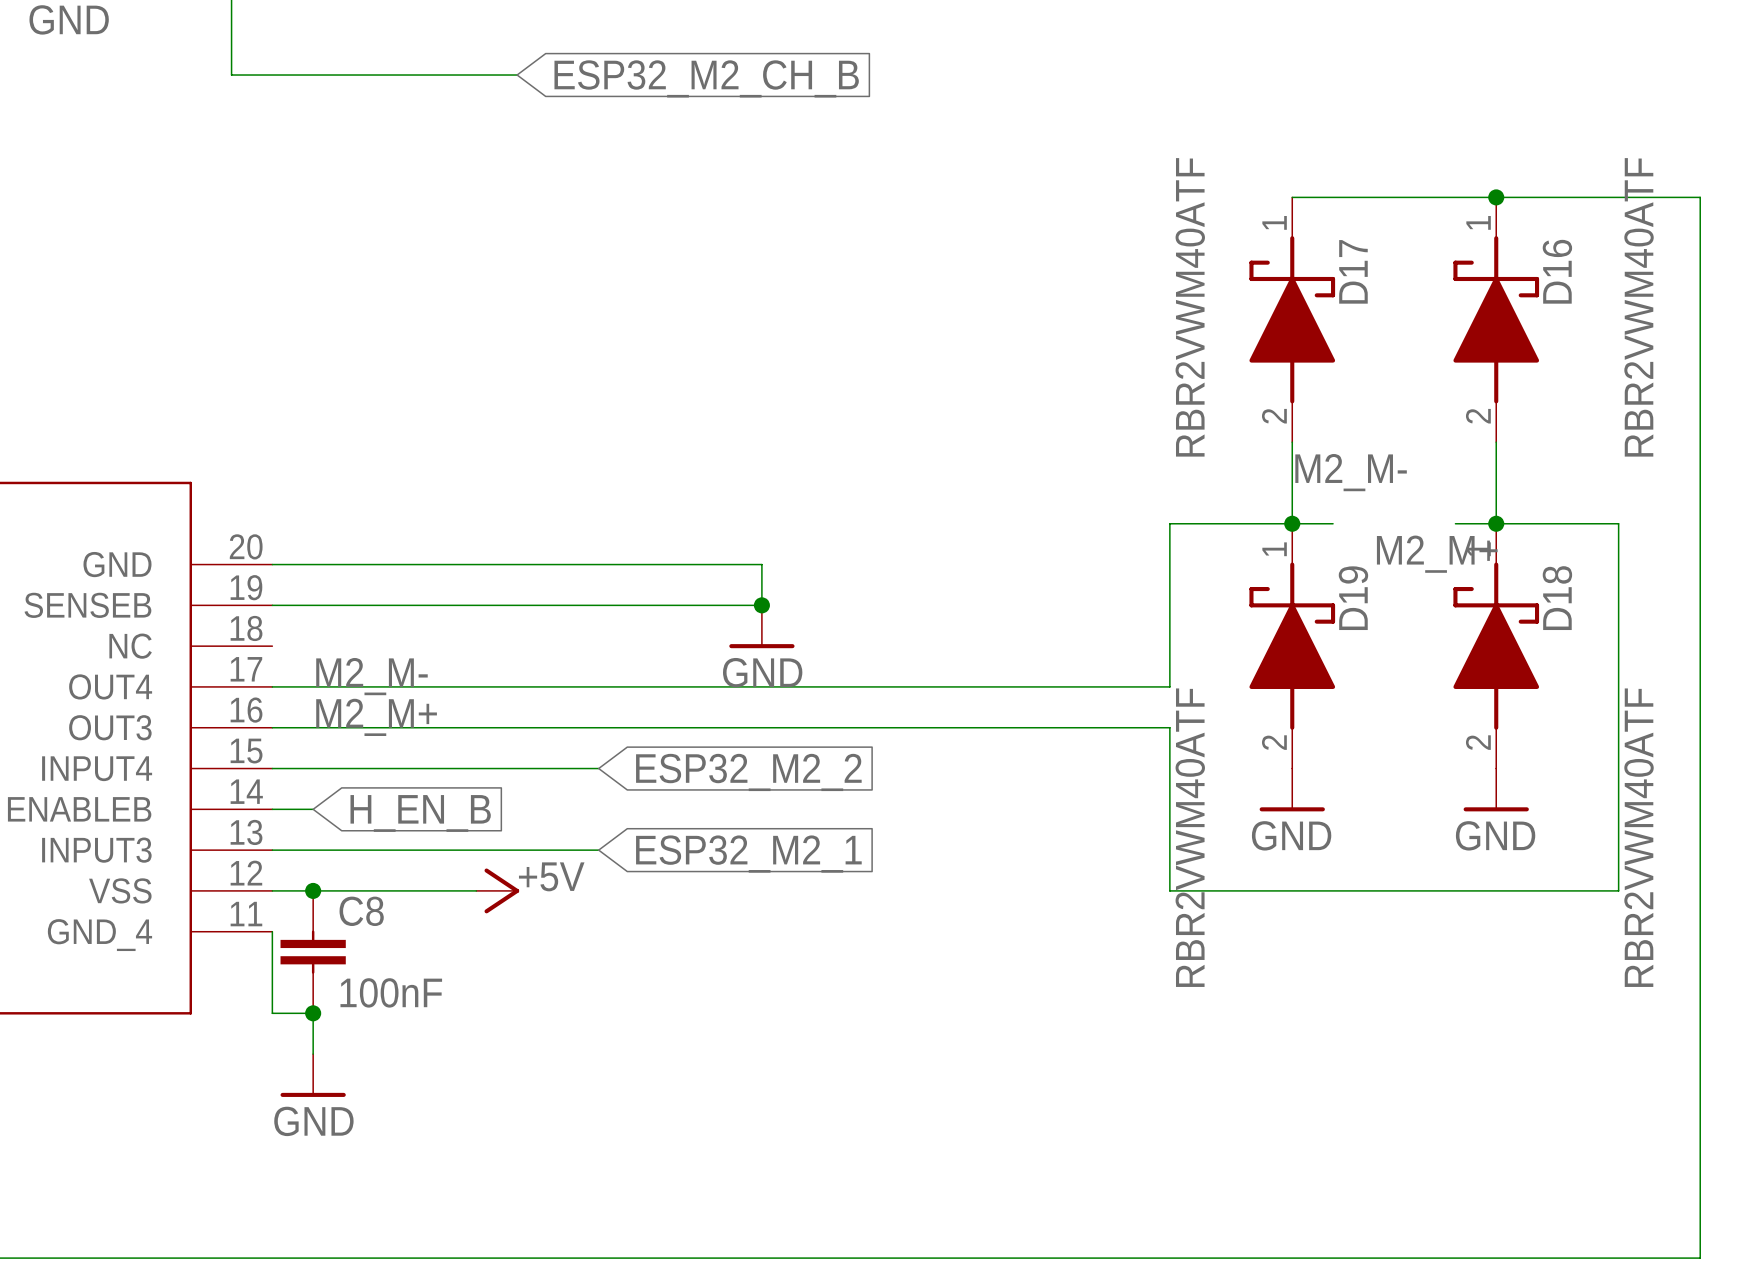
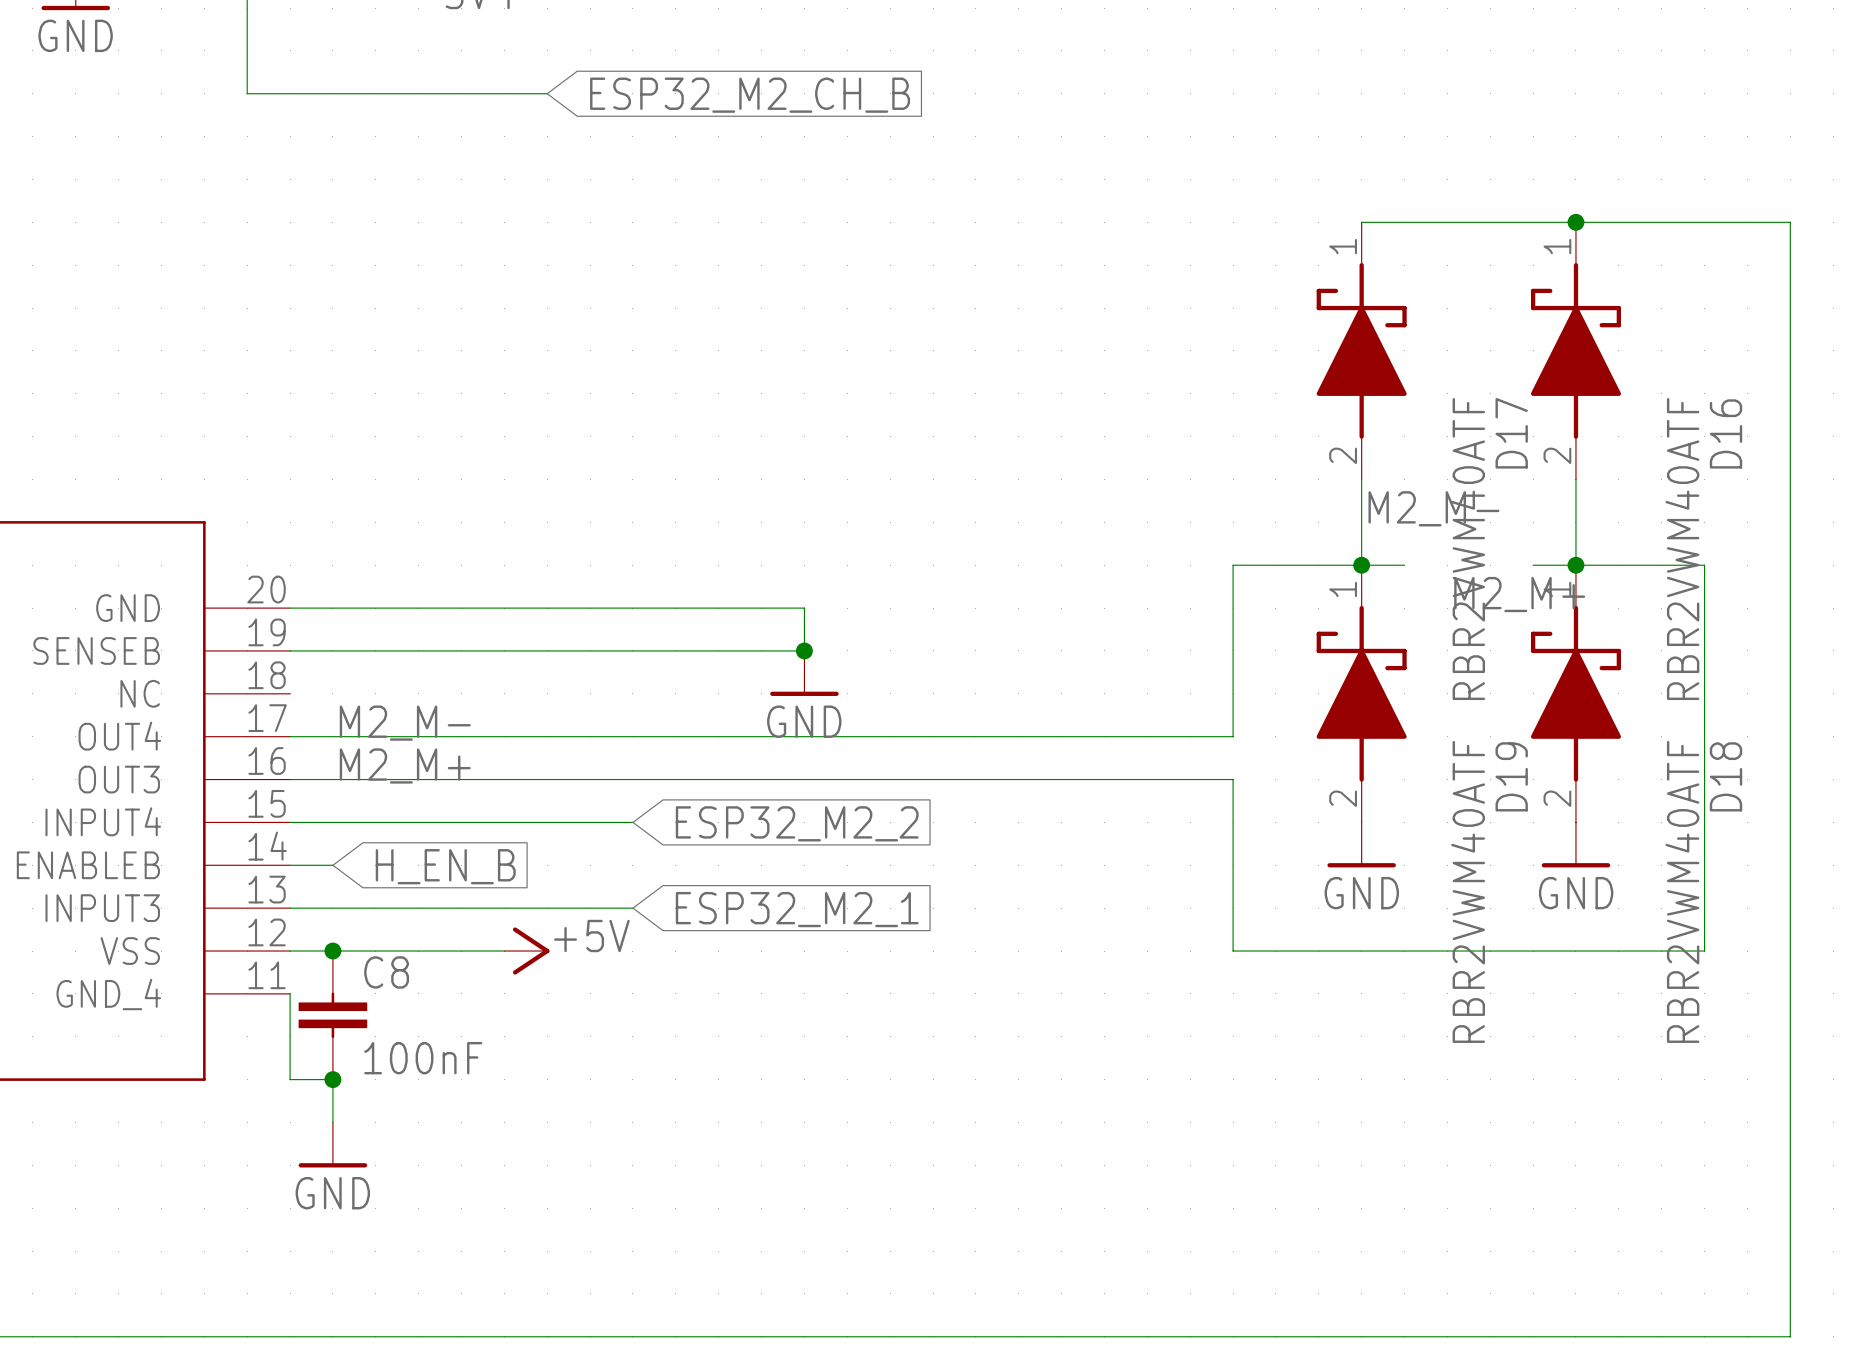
D17 name position: D17 (1353, 271) -> D17 (1511, 433)
D16 name position: D16 (1557, 271) -> D16 (1726, 433)
D17 value position: RBR2VWM40ATF (1190, 307) -> RBR2VWM40ATF (1468, 549)
D16 value position: RBR2VWM40ATF (1639, 307) -> RBR2VWM40ATF (1682, 549)
D19 name position: D19 (1353, 598) -> D19 (1511, 776)
D18 name position: D18 (1557, 598) -> D18 (1726, 776)
D19 value position: RBR2VWM40ATF (1190, 837) -> RBR2VWM40ATF (1468, 891)
D18 value position: RBR2VWM40ATF (1639, 837) -> RBR2VWM40ATF (1682, 891)

